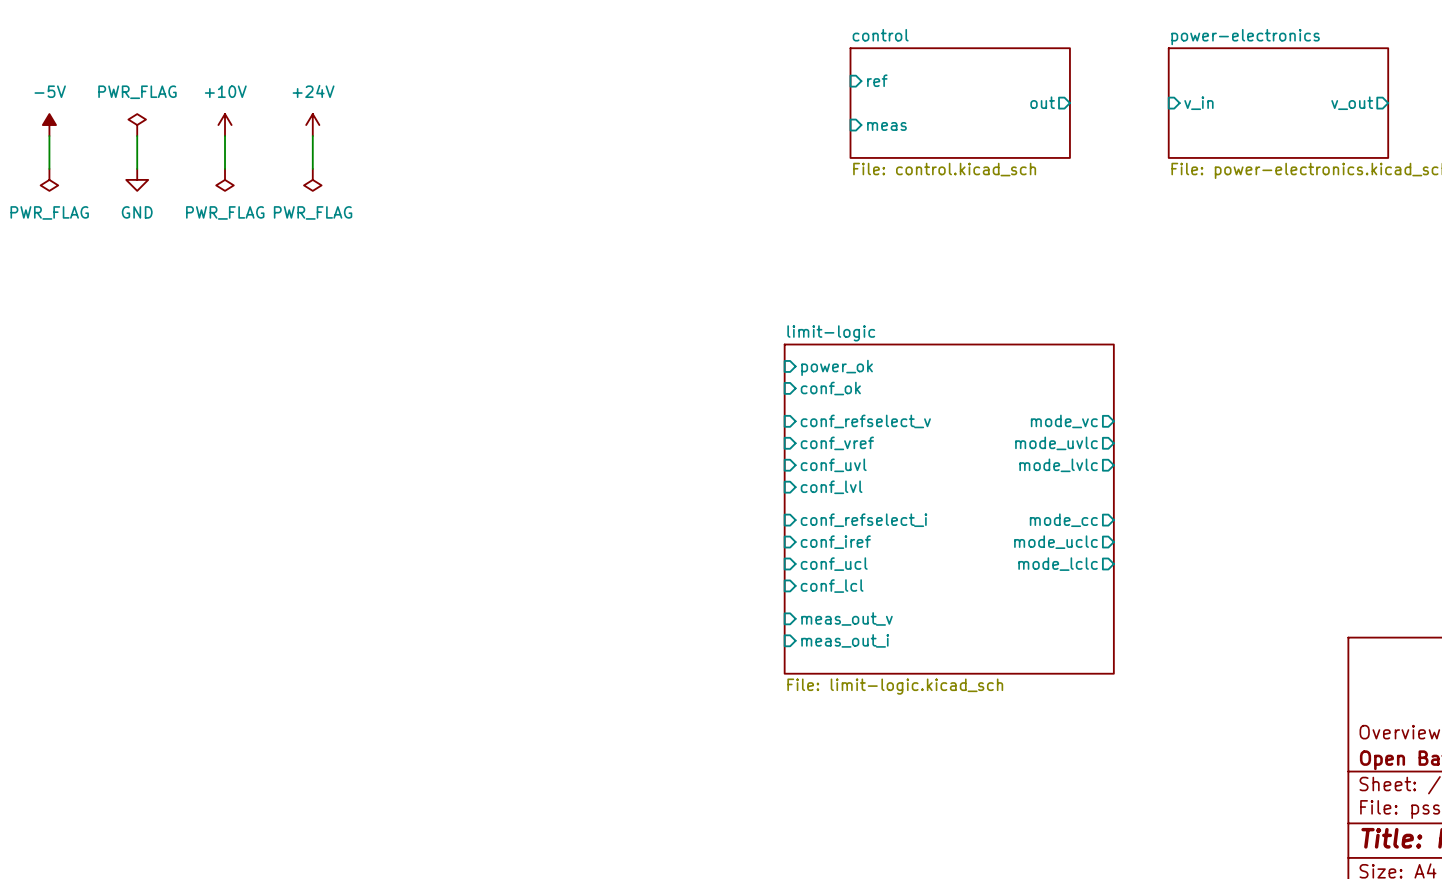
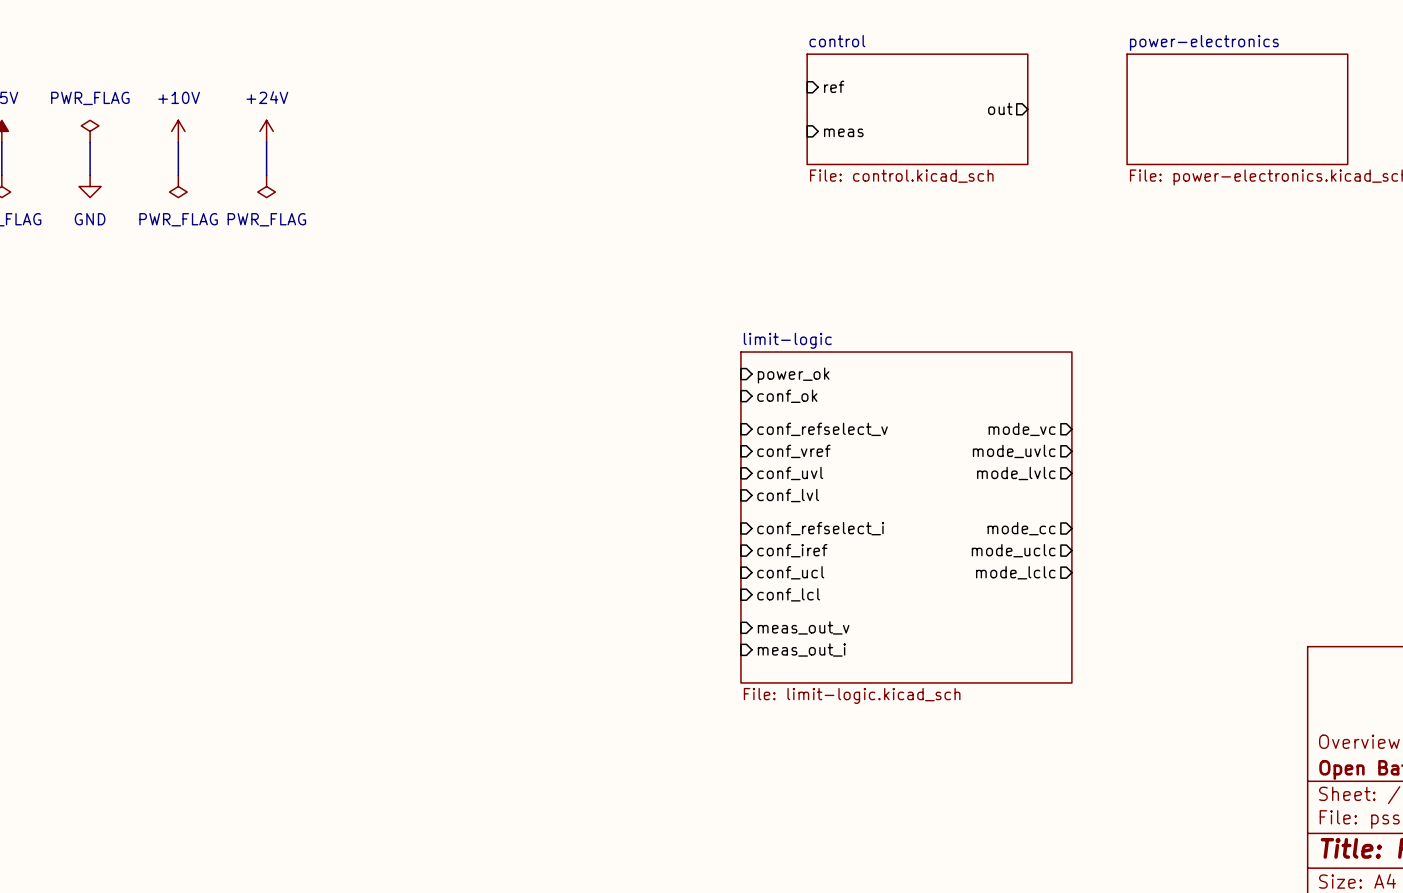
sheet pin: v_in (1198, 103) -> none
sheet pin: v_out (1352, 103) -> none

